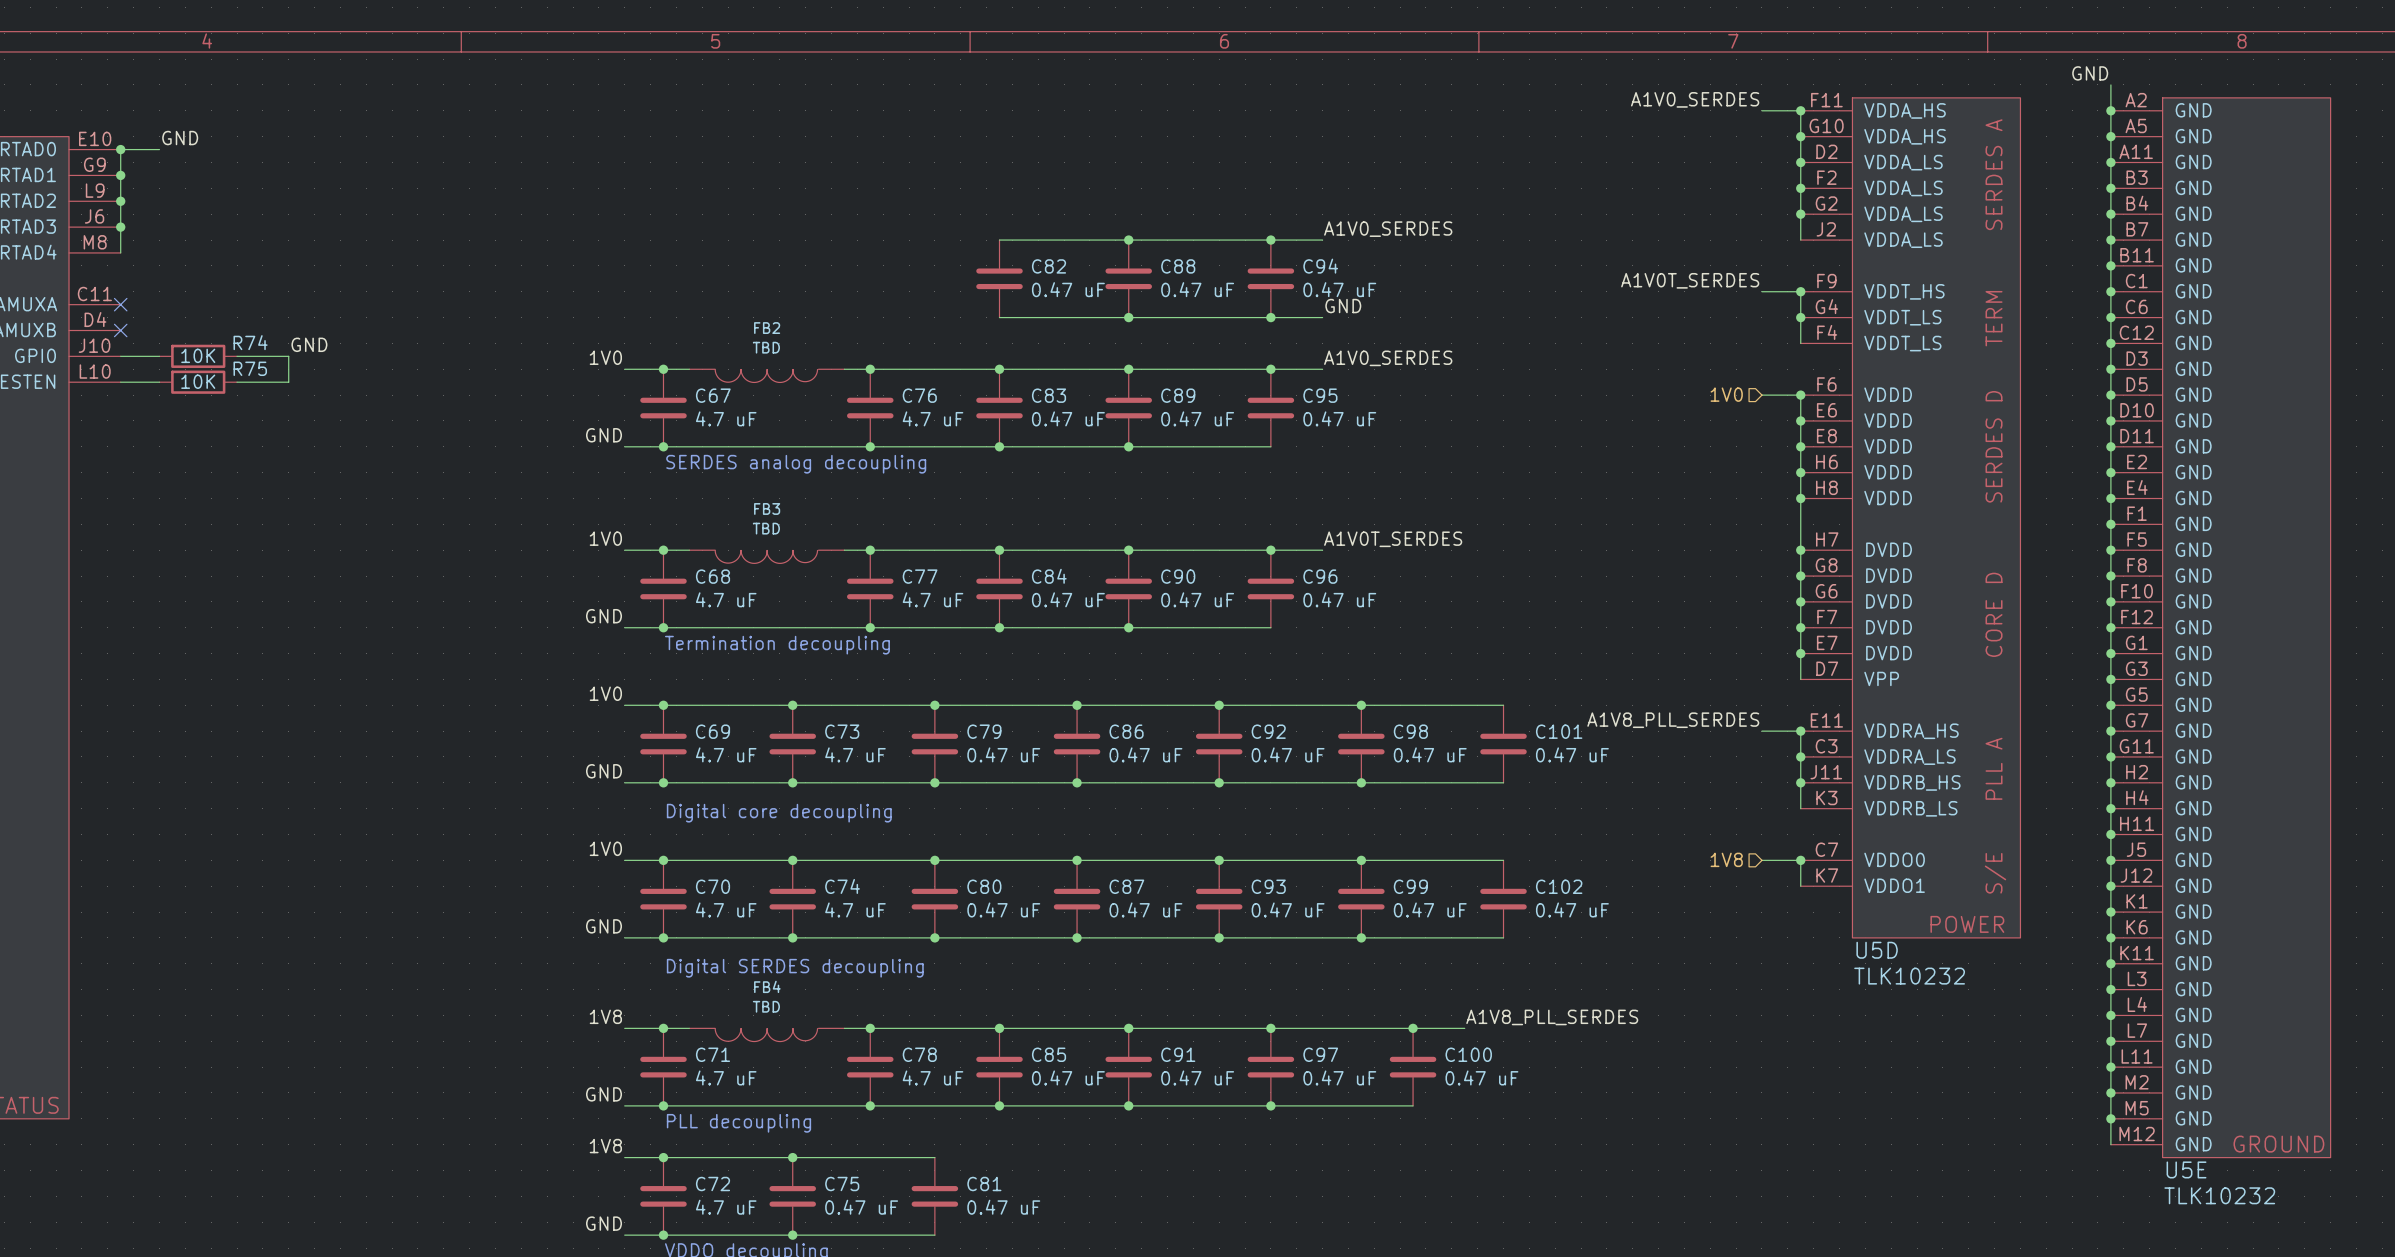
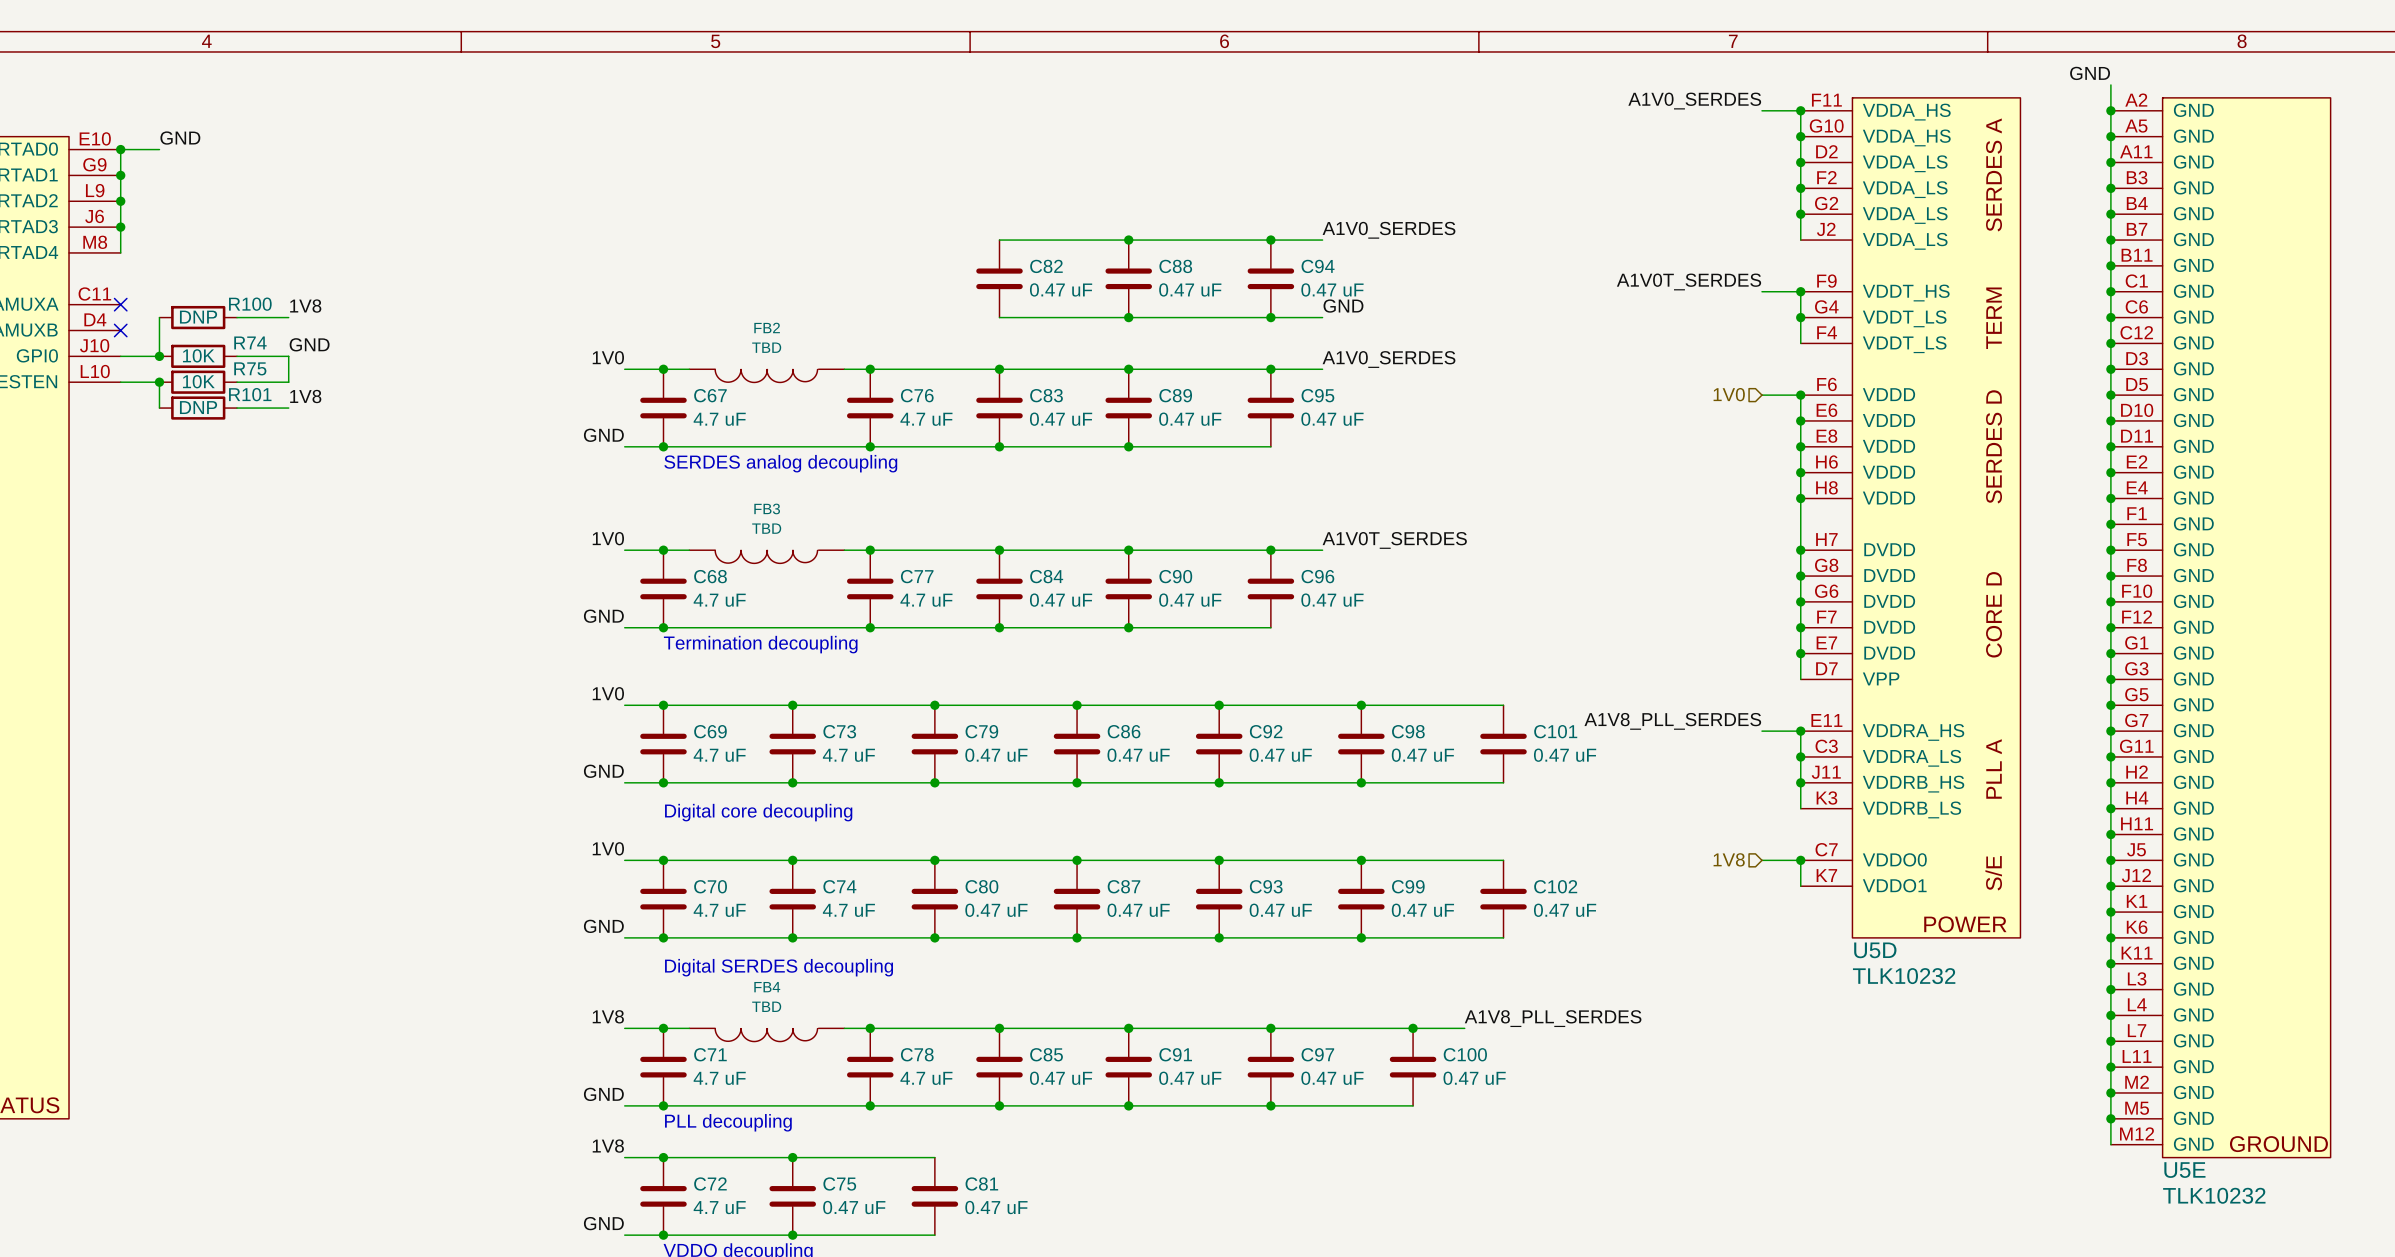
label: none -> 1V8 (305, 306)
wire: none -> (159, 317) (159, 356)
R100: none -> DNP (198, 317)
wire: none -> (237, 317) (288, 317)
junction: none -> (159, 356)
wire: none -> (159, 382) (159, 408)
junction: none -> (159, 382)
label: none -> 1V8 (305, 396)
R101: none -> DNP (198, 408)
wire: none -> (237, 408) (288, 408)

